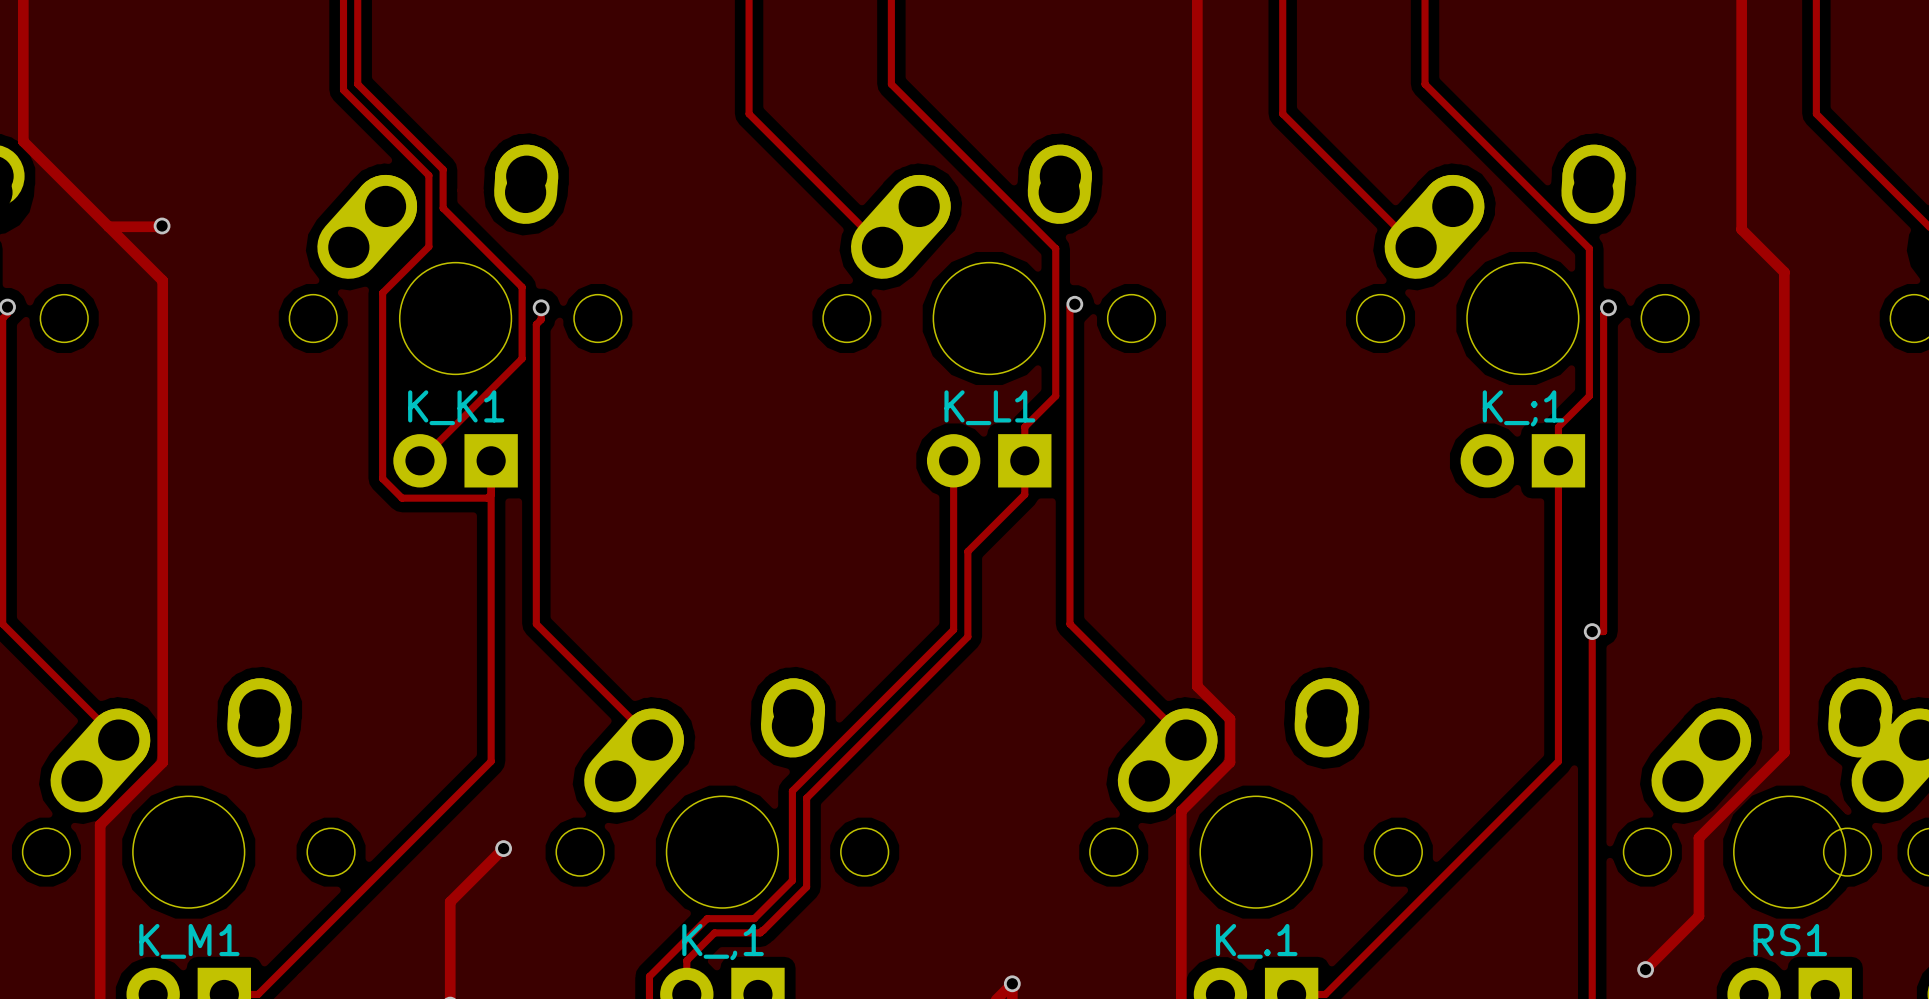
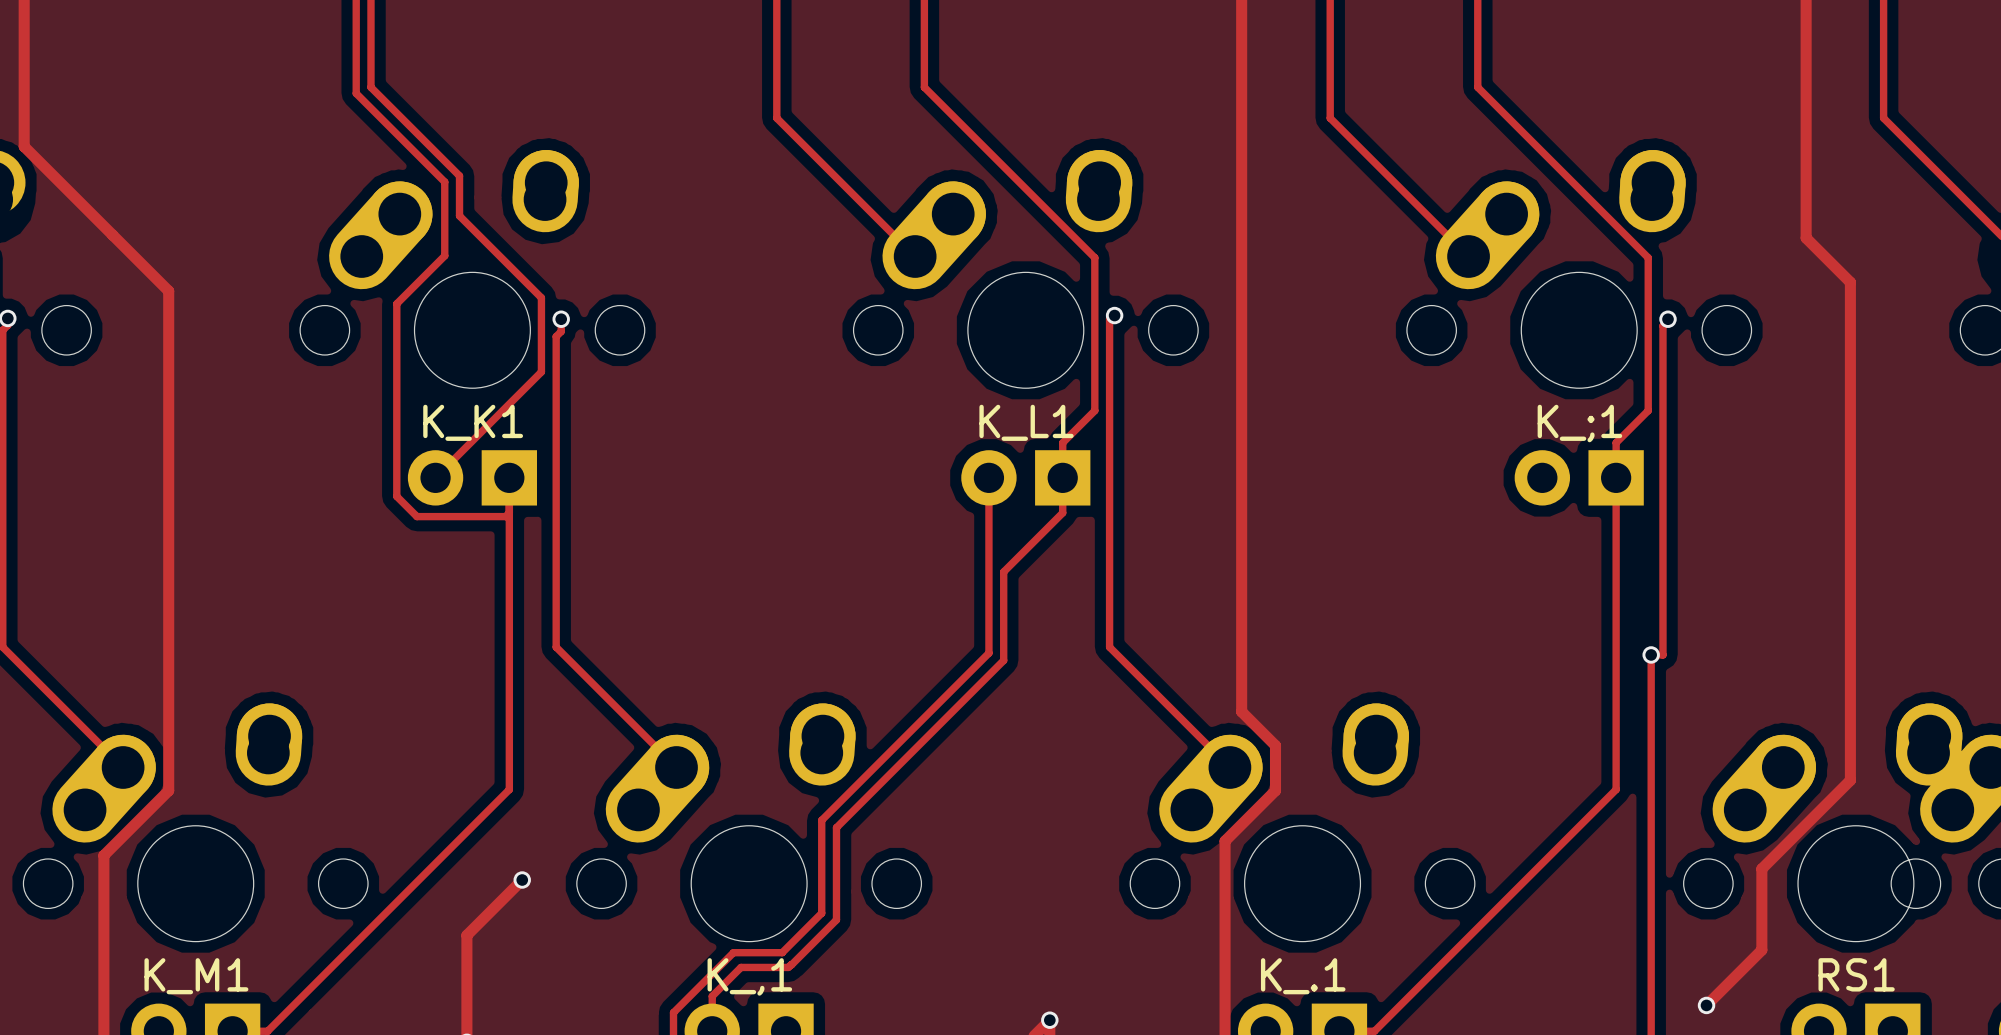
track: (162, 226) (108, 226) -> none
via: (162, 226) -> none

